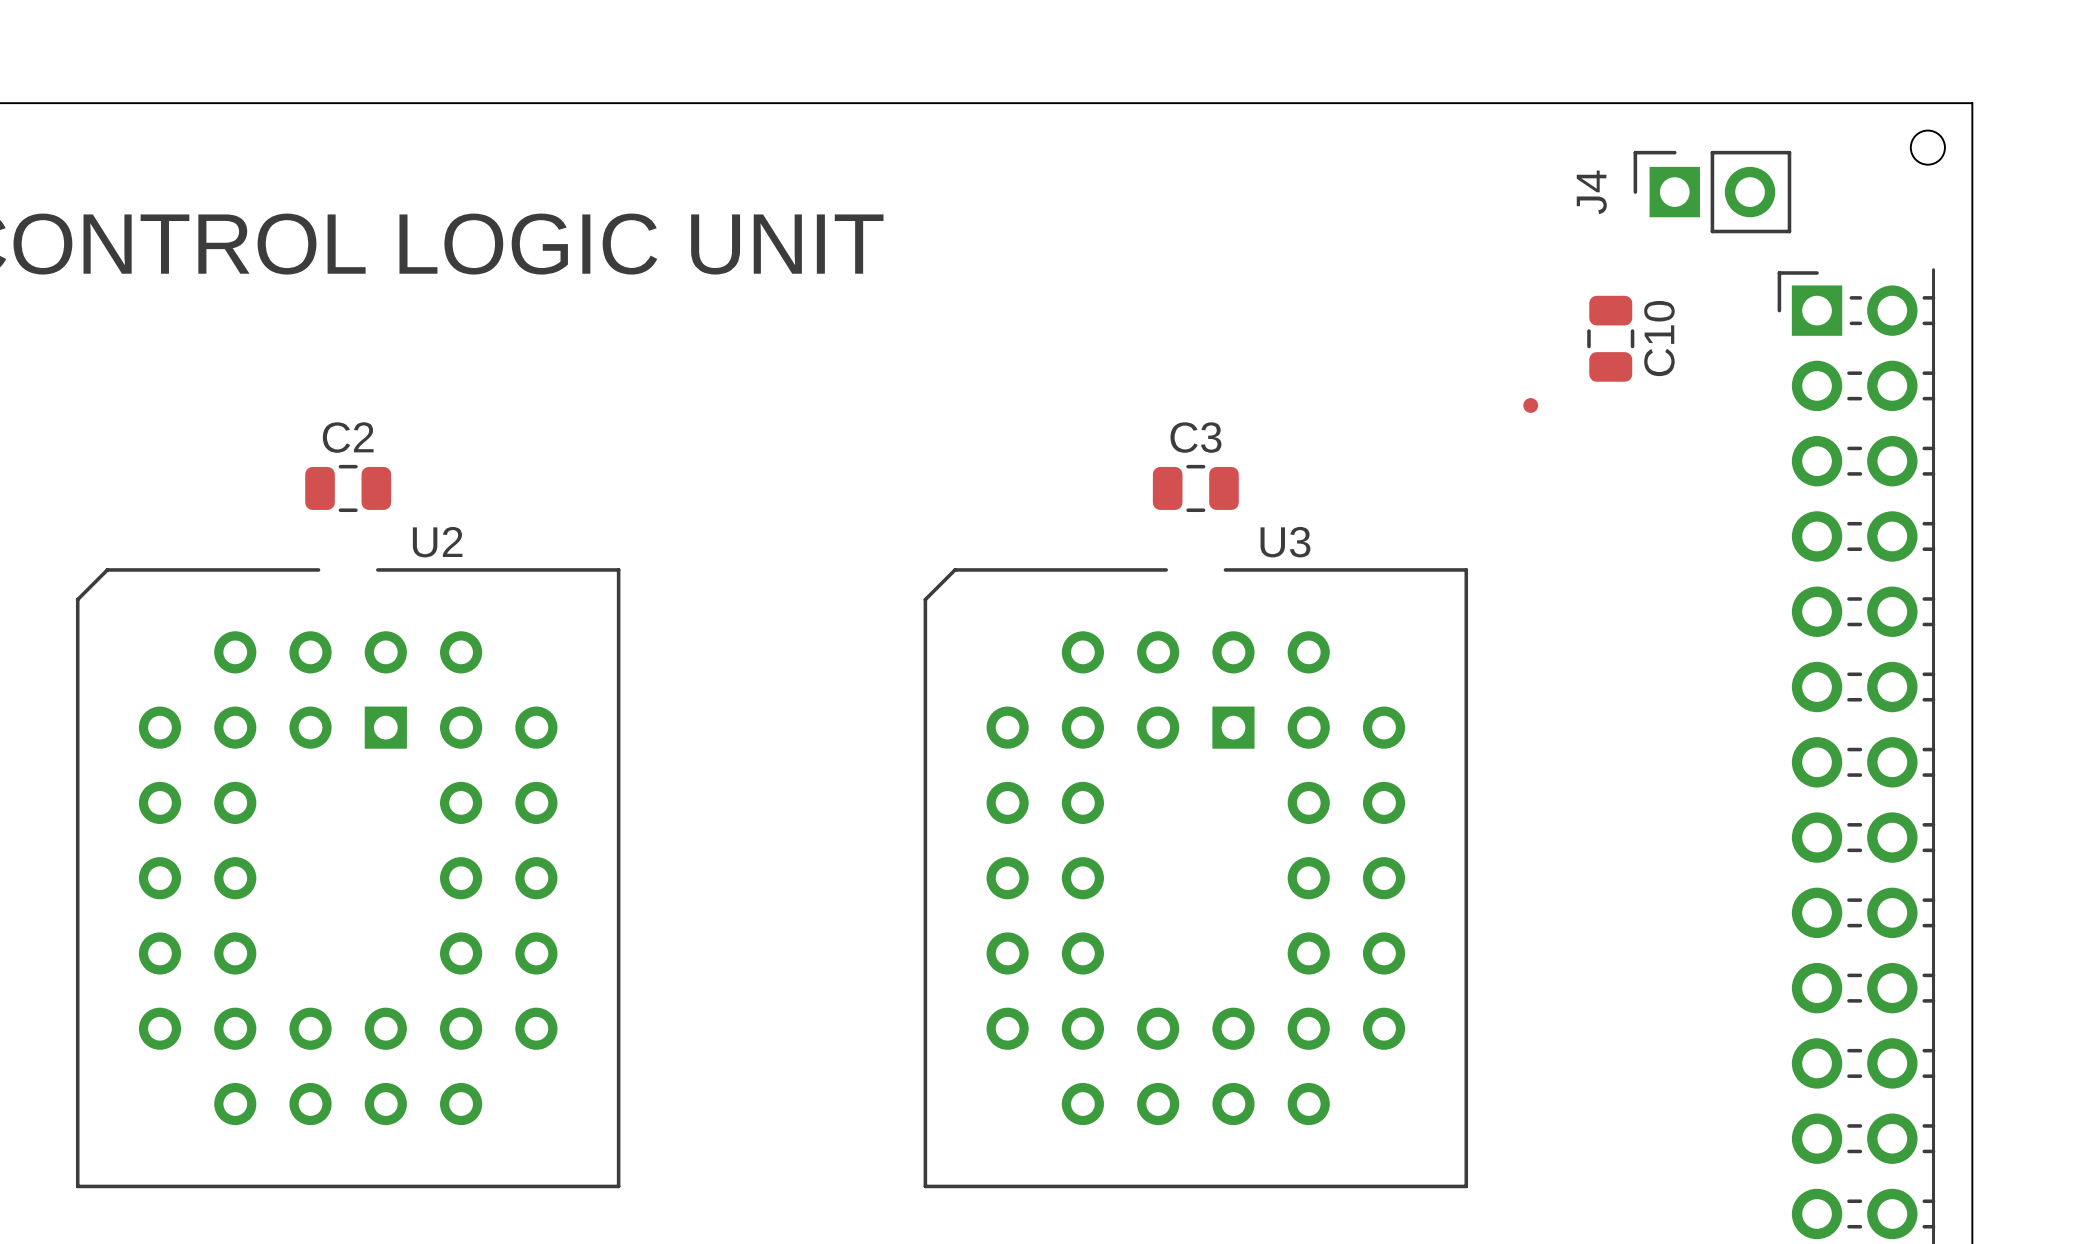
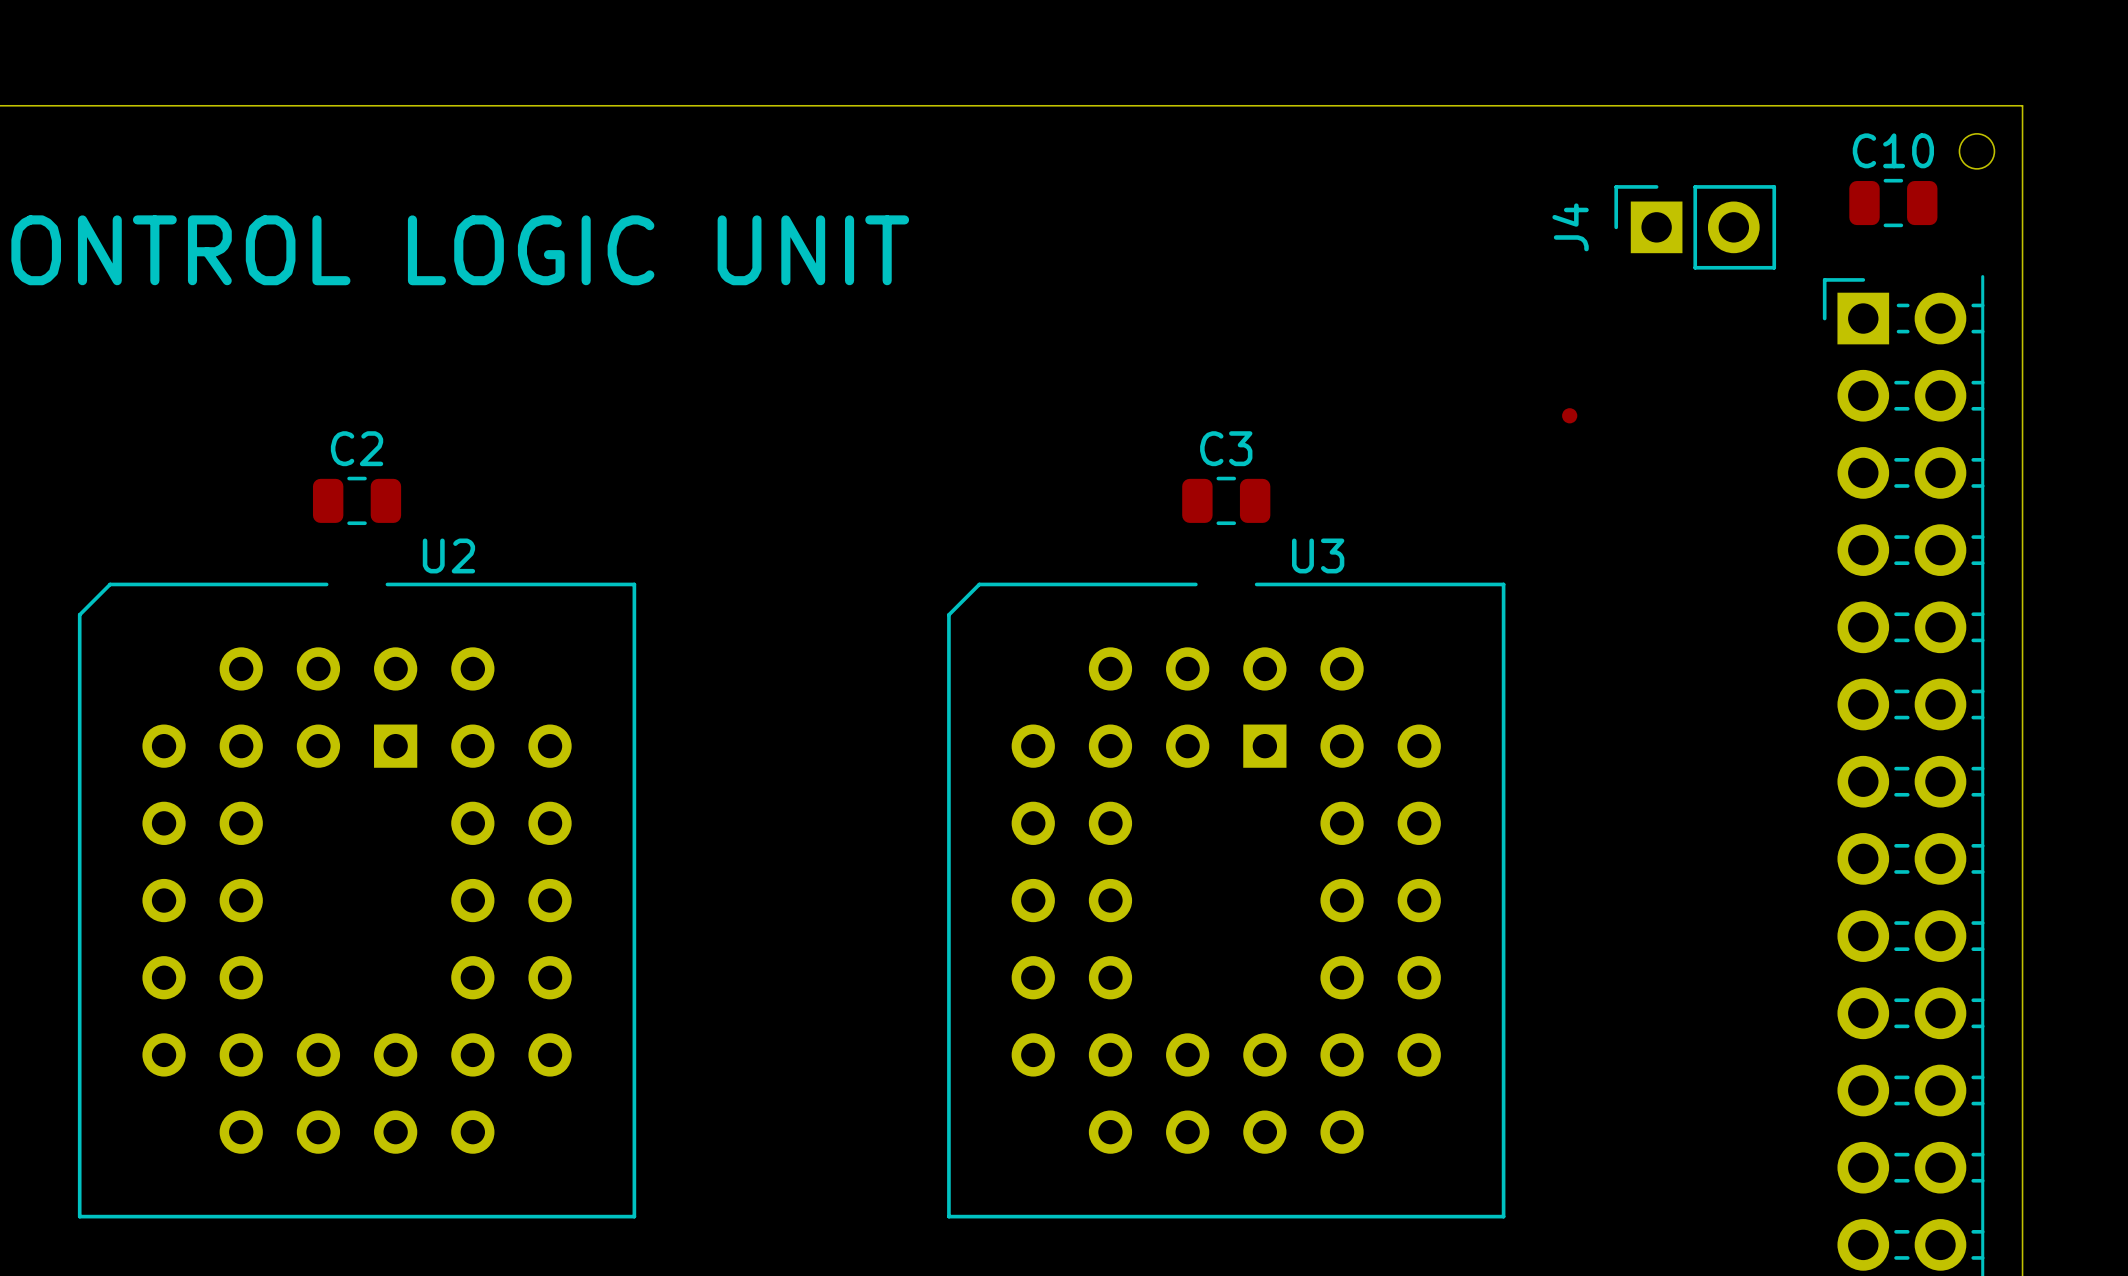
J4 position: (1712, 192) -> (1695, 227)
C10 rotation: 0° (1610, 338) -> 90° clockwise (1893, 203)
C10 position: (1610, 338) -> (1893, 203)
C10 name position: C10 (1659, 338) -> C10 (1893, 150)

